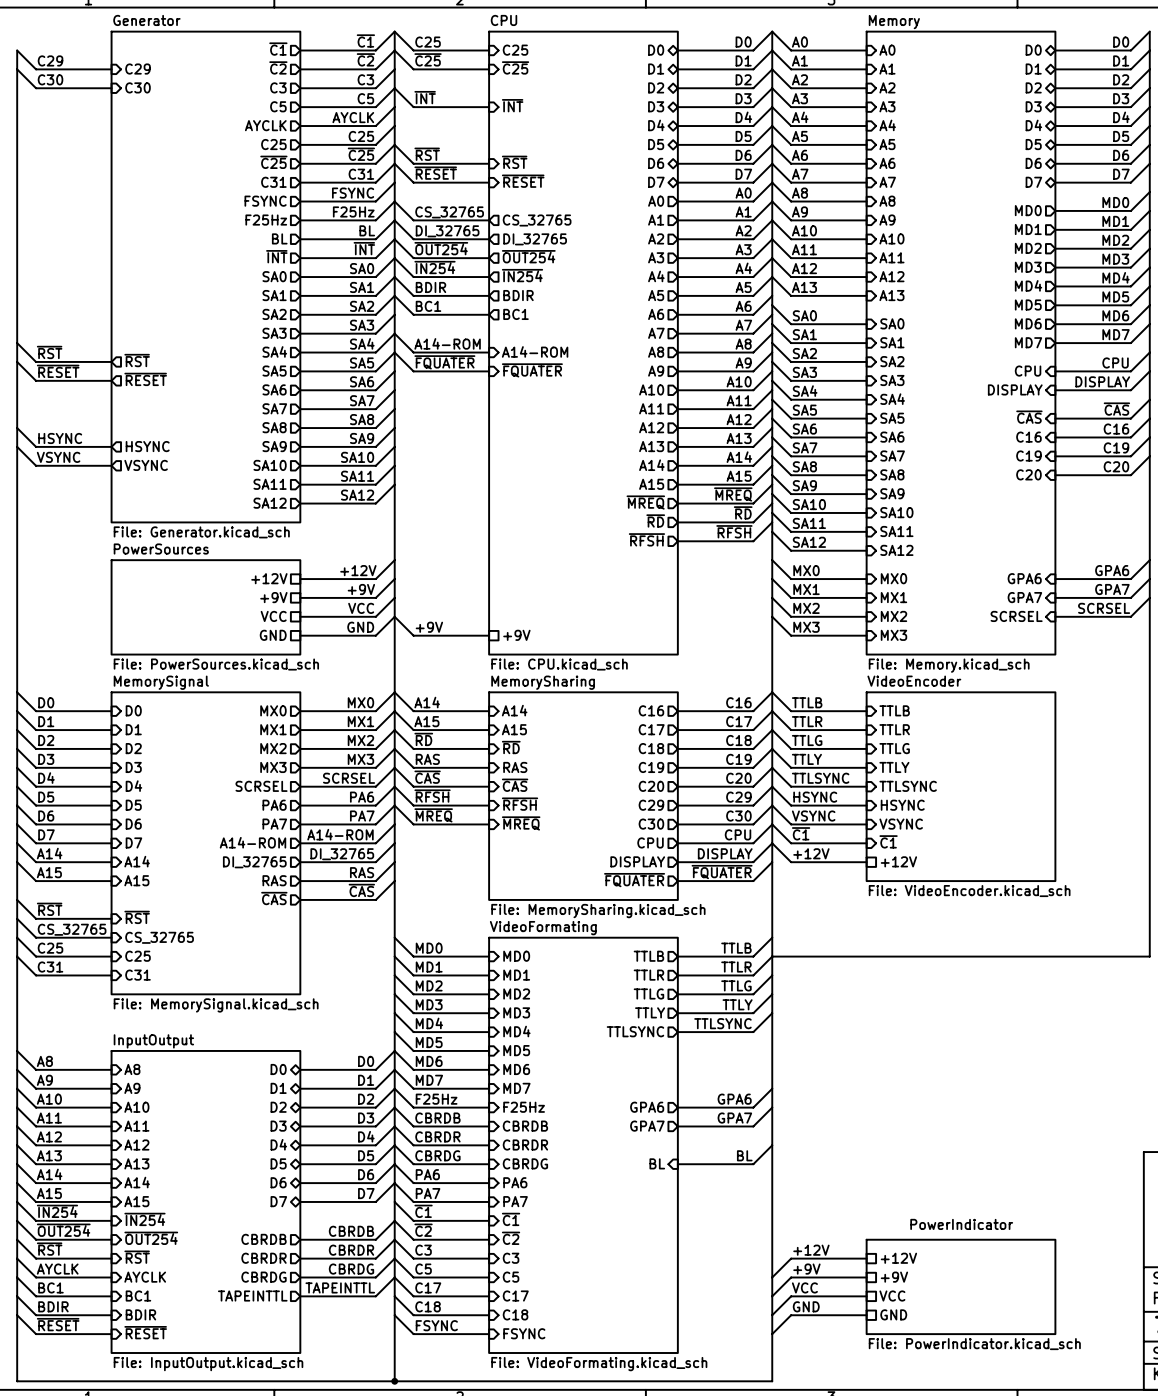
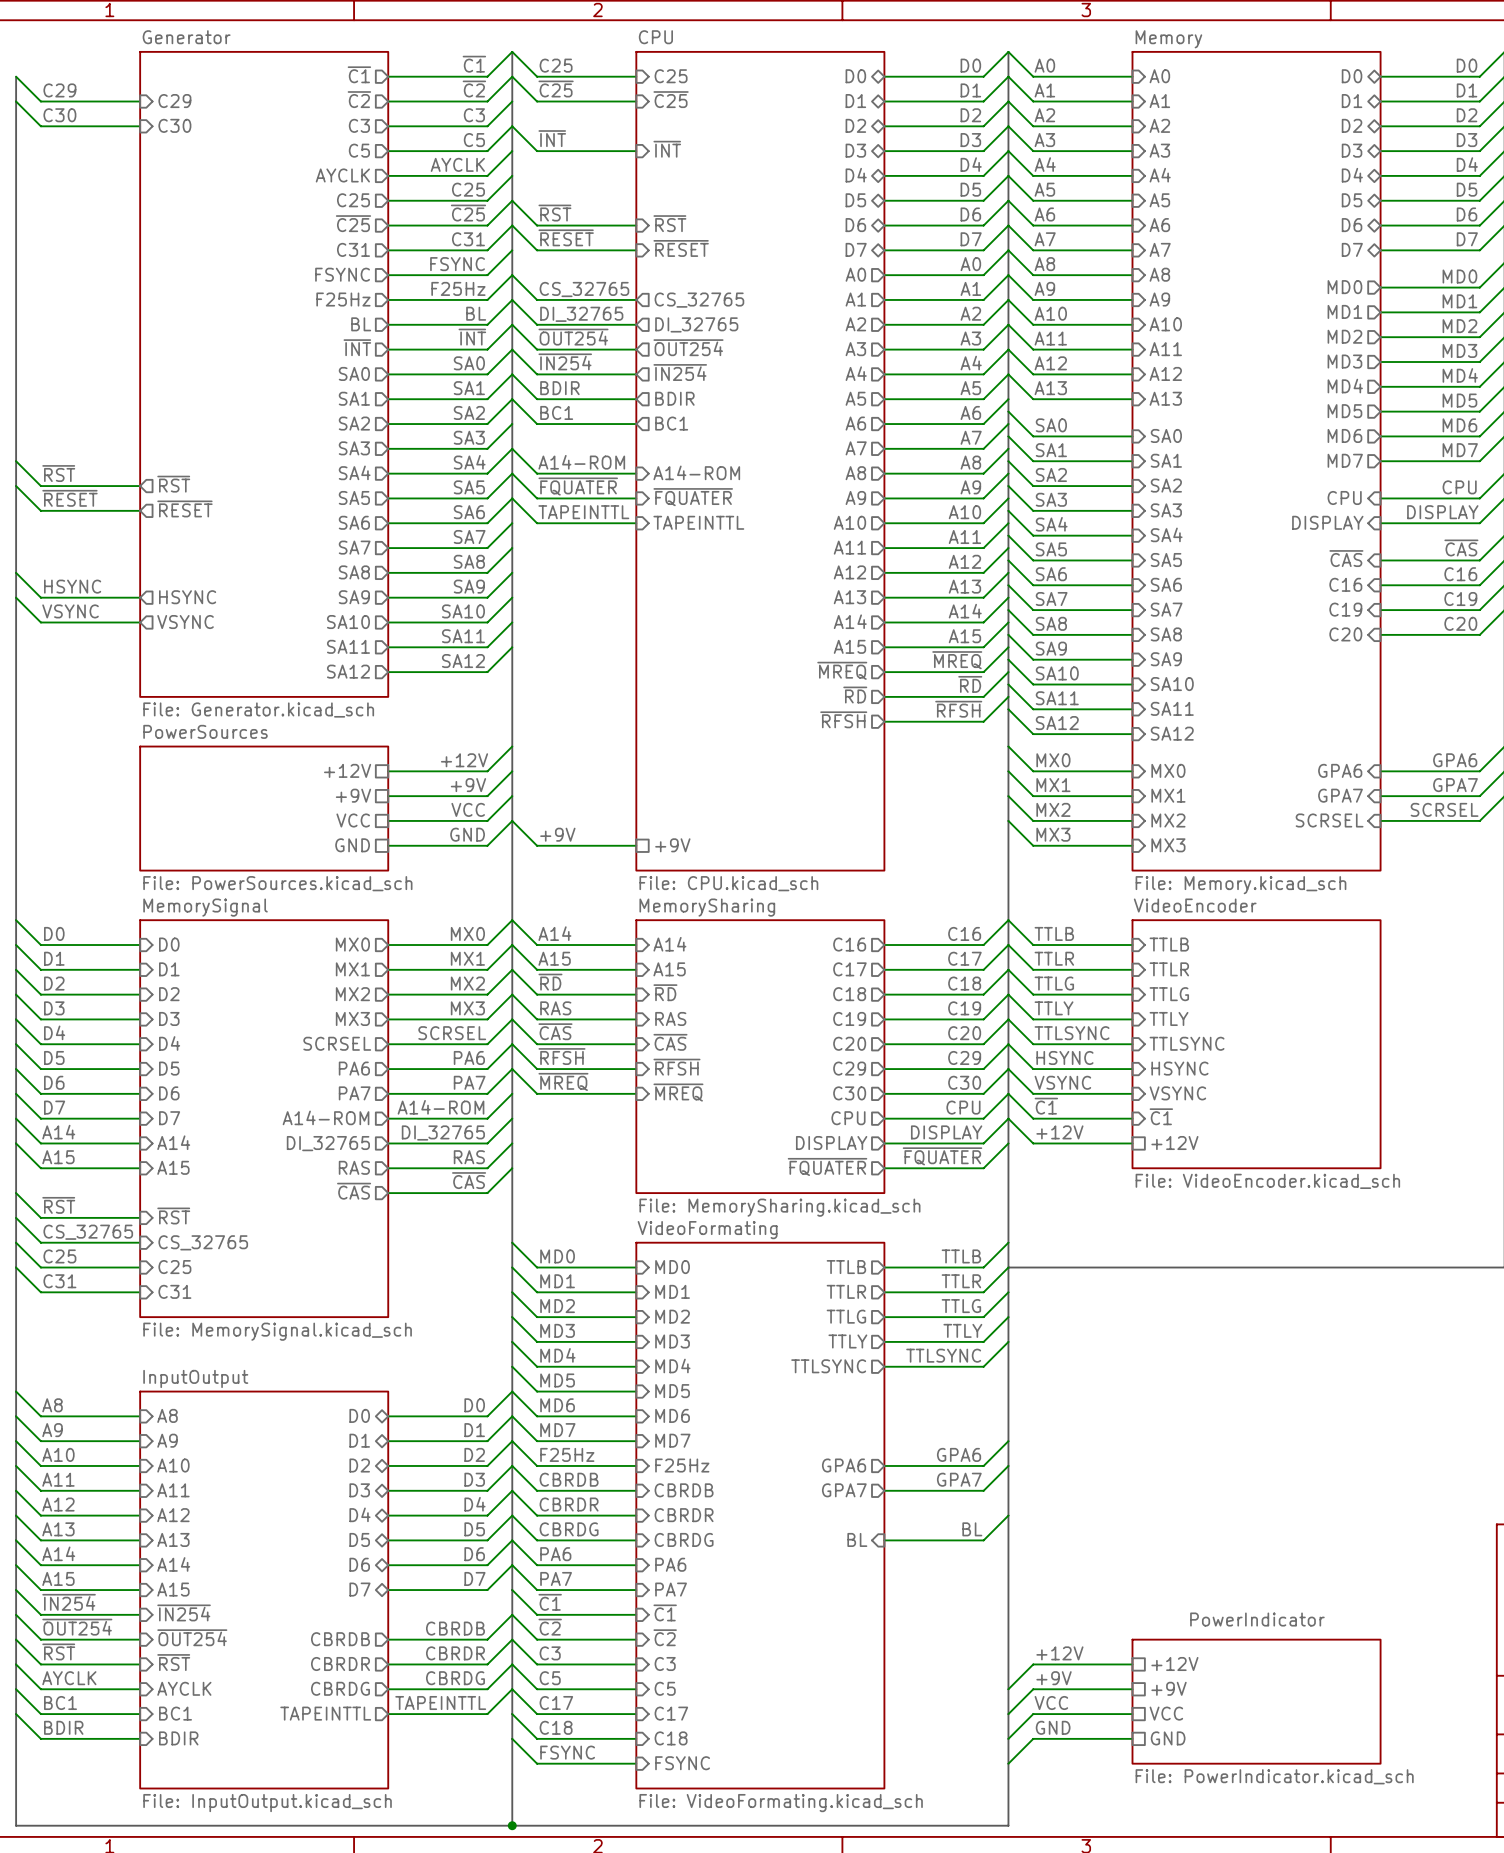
wire: none -> (512, 498) (537, 523) (636, 523)
label: none -> TAPEINTTL (583, 512)
sheet pin: none -> TAPEINTTL (698, 522)
wire: (17, 1315) (36, 1334) (111, 1334) -> none
label: ~{RESET} (58, 1324) -> none
sheet pin: ~{RESET} (145, 1332) -> none

